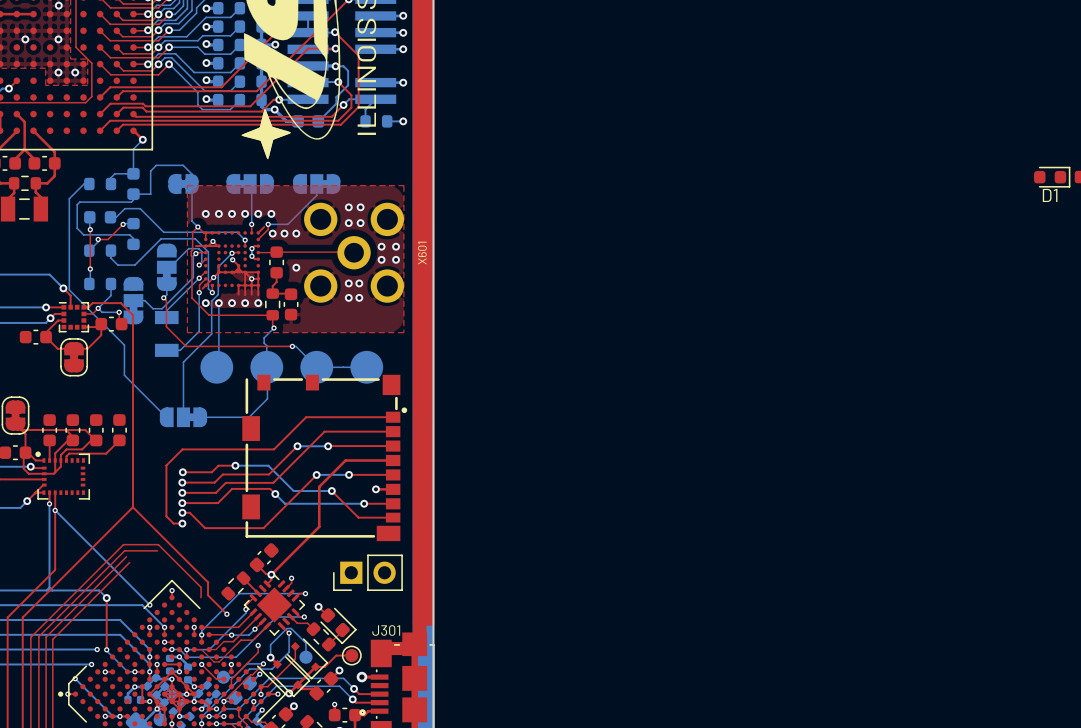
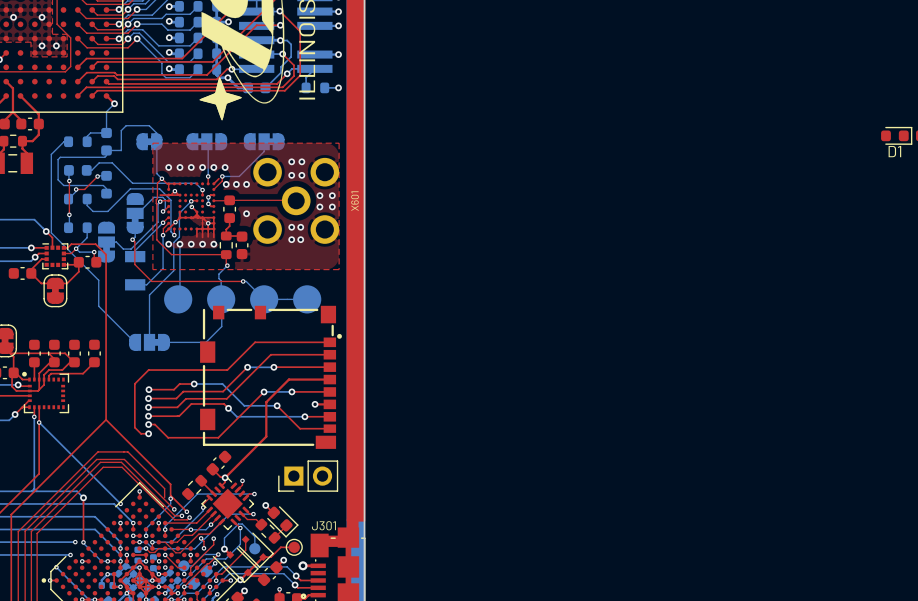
top track: (157, 550) (124, 550) (122, 553) -> (174, 509) (124, 459) (96, 459)
top track: none -> (100, 462) (121, 462) (174, 515) (181, 515)
top track: none -> (103, 467) (122, 467) (174, 519) (187, 519) (189, 517)
bottom track: none -> (170, 498) (170, 504) (146, 528) (146, 535)
via: none -> (170, 498)
via: none -> (174, 509)
via: none -> (181, 515)
via: none -> (189, 517)
via: none -> (146, 535)
top track: none -> (201, 538) (203, 541) (203, 548)
via: none -> (201, 538)
bottom track: (179, 656) (188, 665) (185, 667) -> none
via: none -> (203, 548)
top track: none -> (165, 548) (158, 548) (154, 552) (150, 552) (146, 548)
via: none -> (159, 561)
via: none -> (165, 567)
via: none -> (184, 574)

